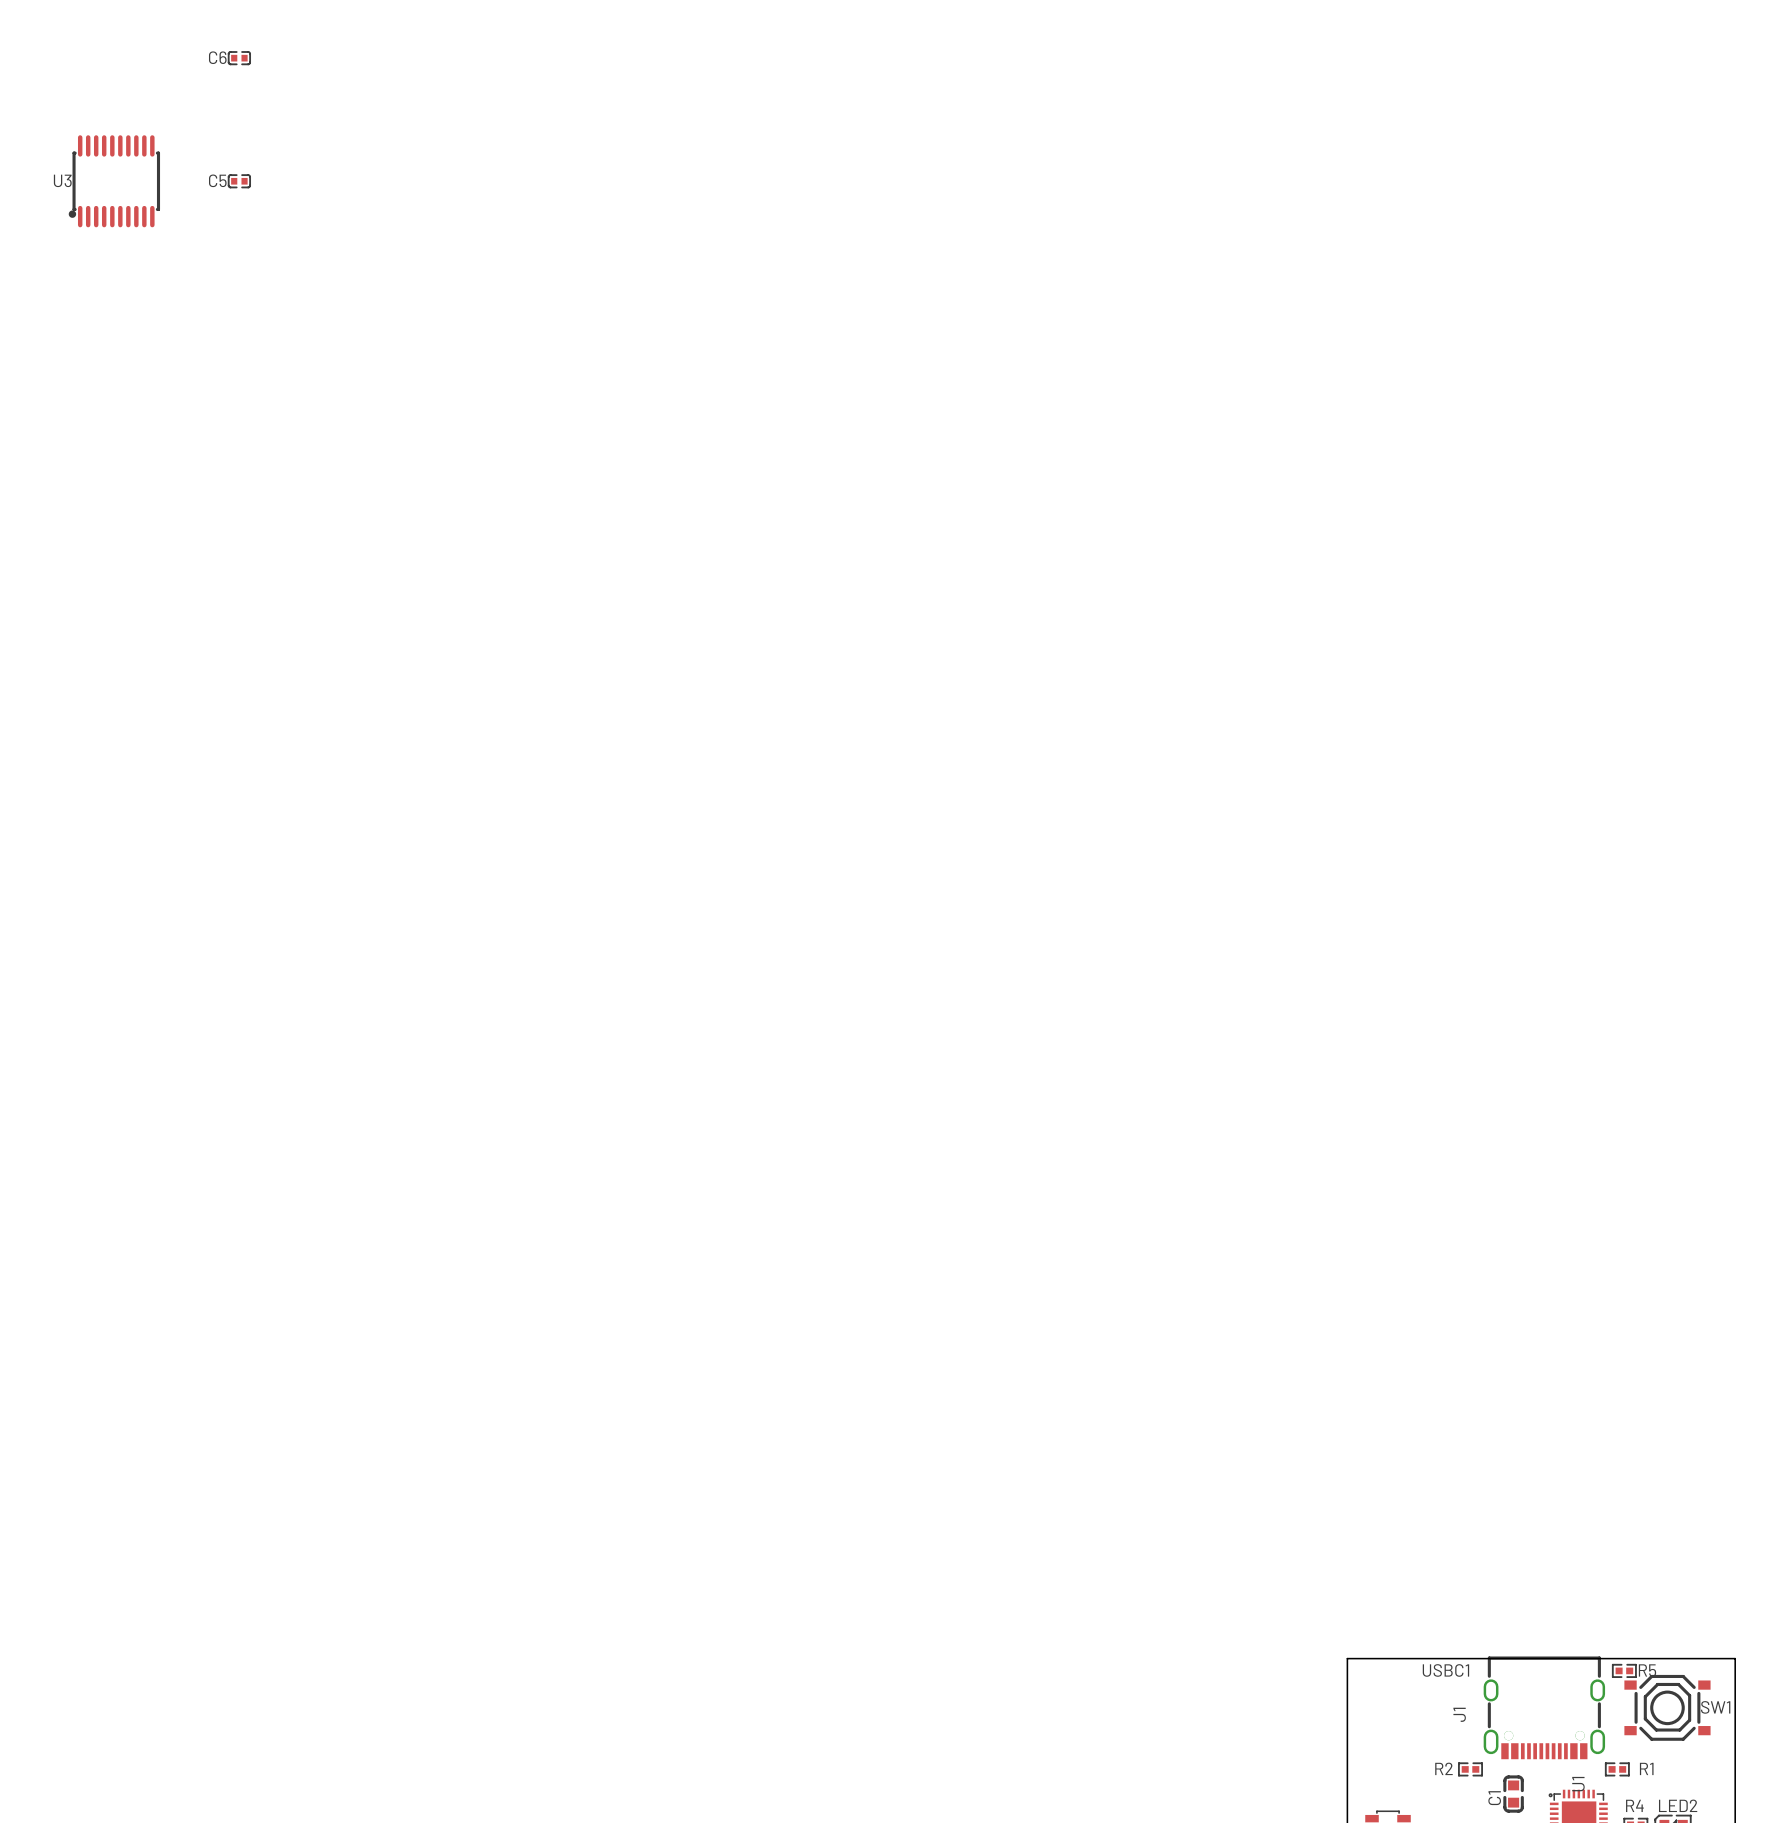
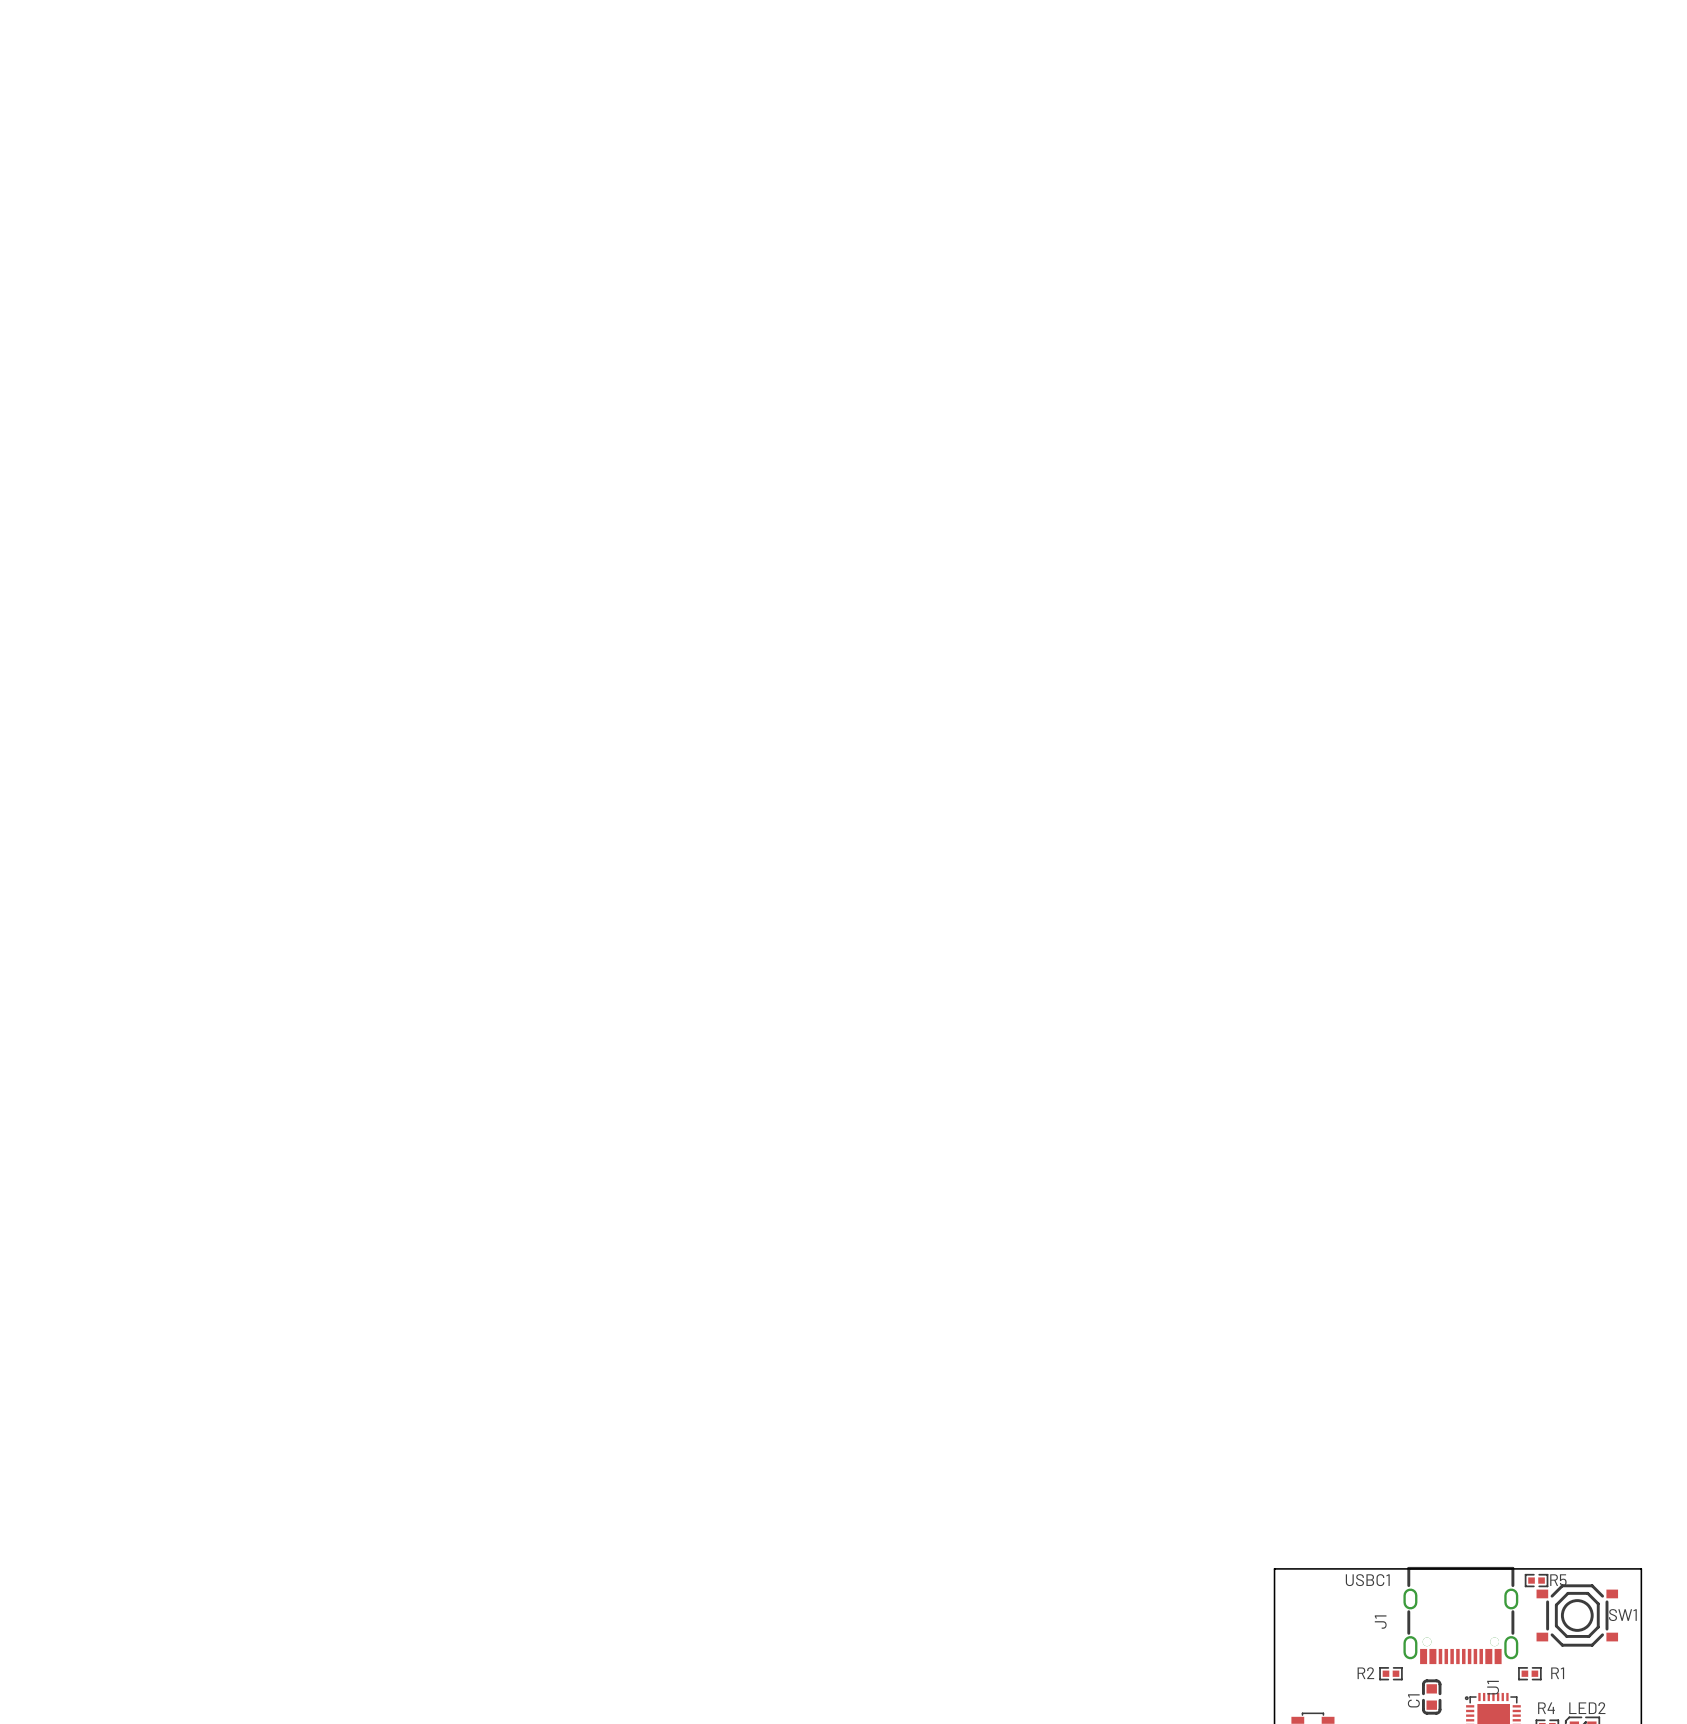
C6: (239, 58) -> none
U3: (114, 181) -> none
C5: (239, 181) -> none

